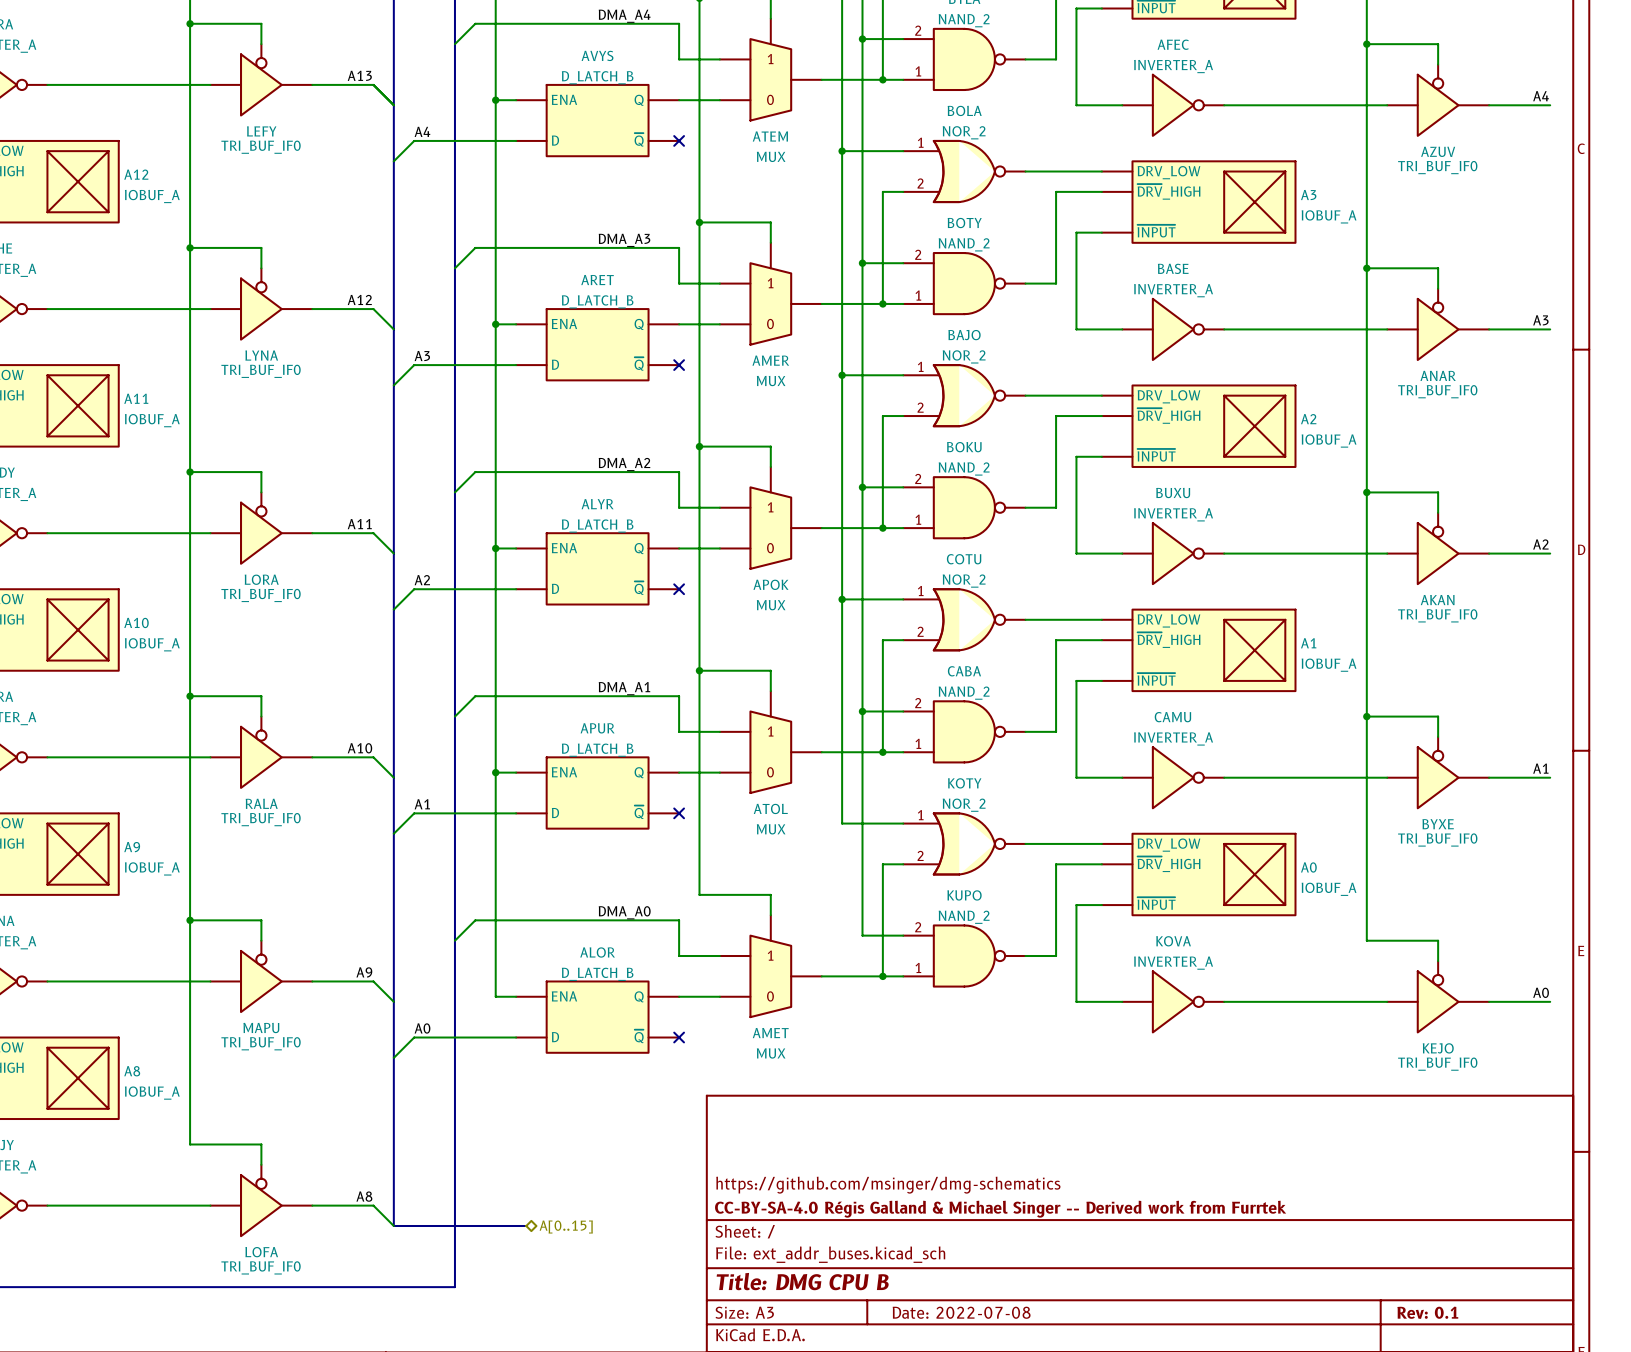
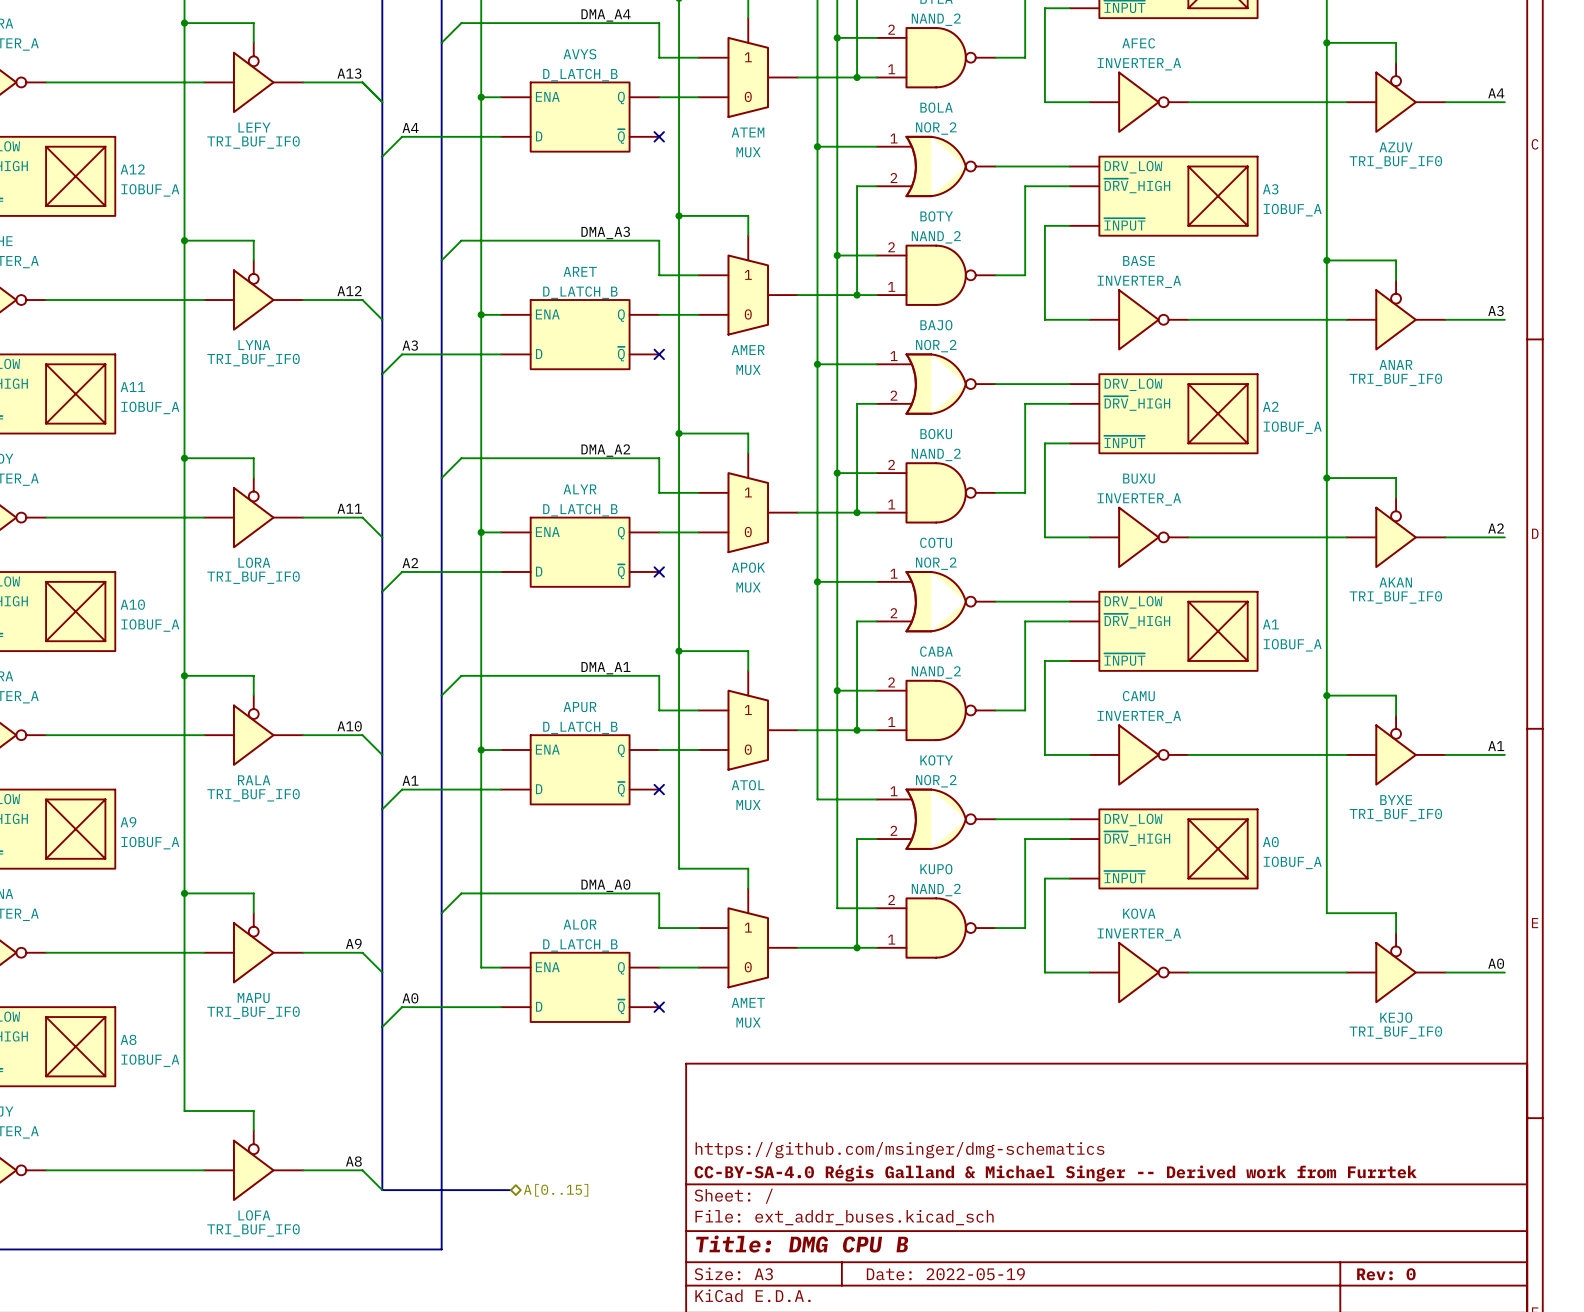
title block: Date: 2022-07-08 (961, 1312) -> Date: 2022-05-19 (945, 1274)
title block: Rev: 0.1 (1427, 1312) -> Rev: 0 (1386, 1274)

